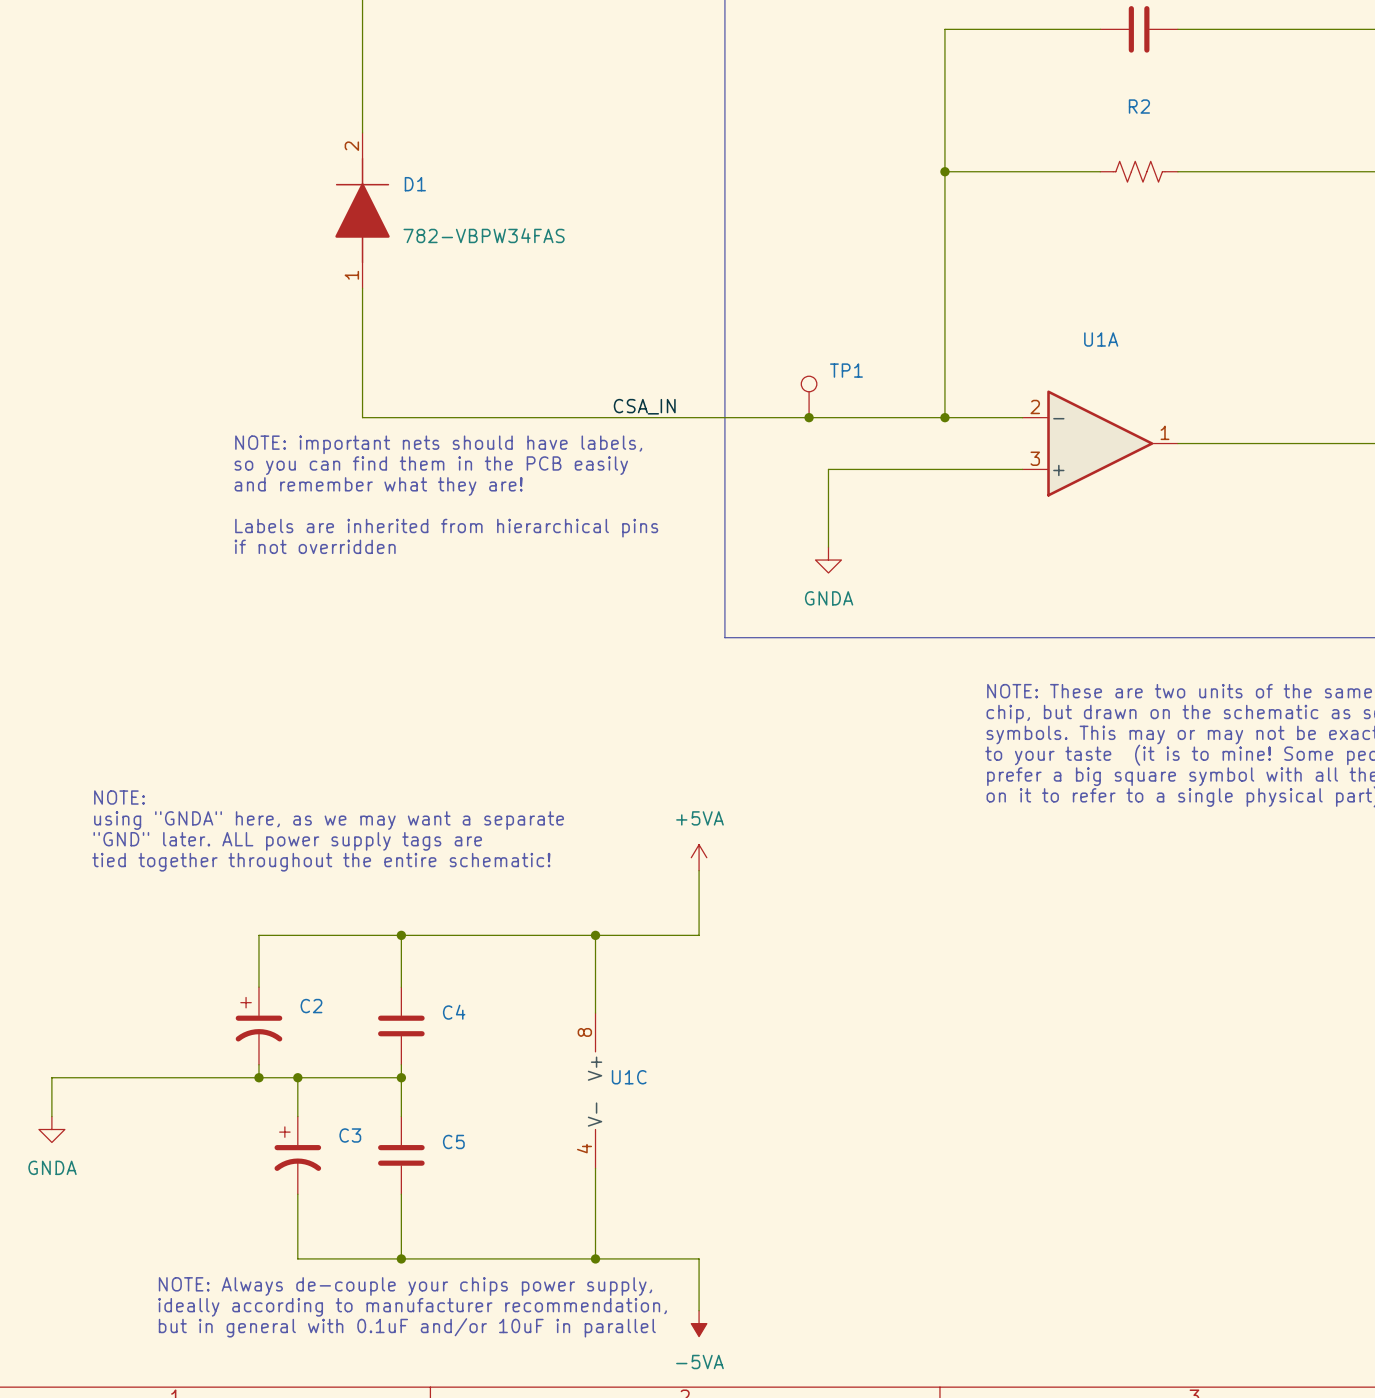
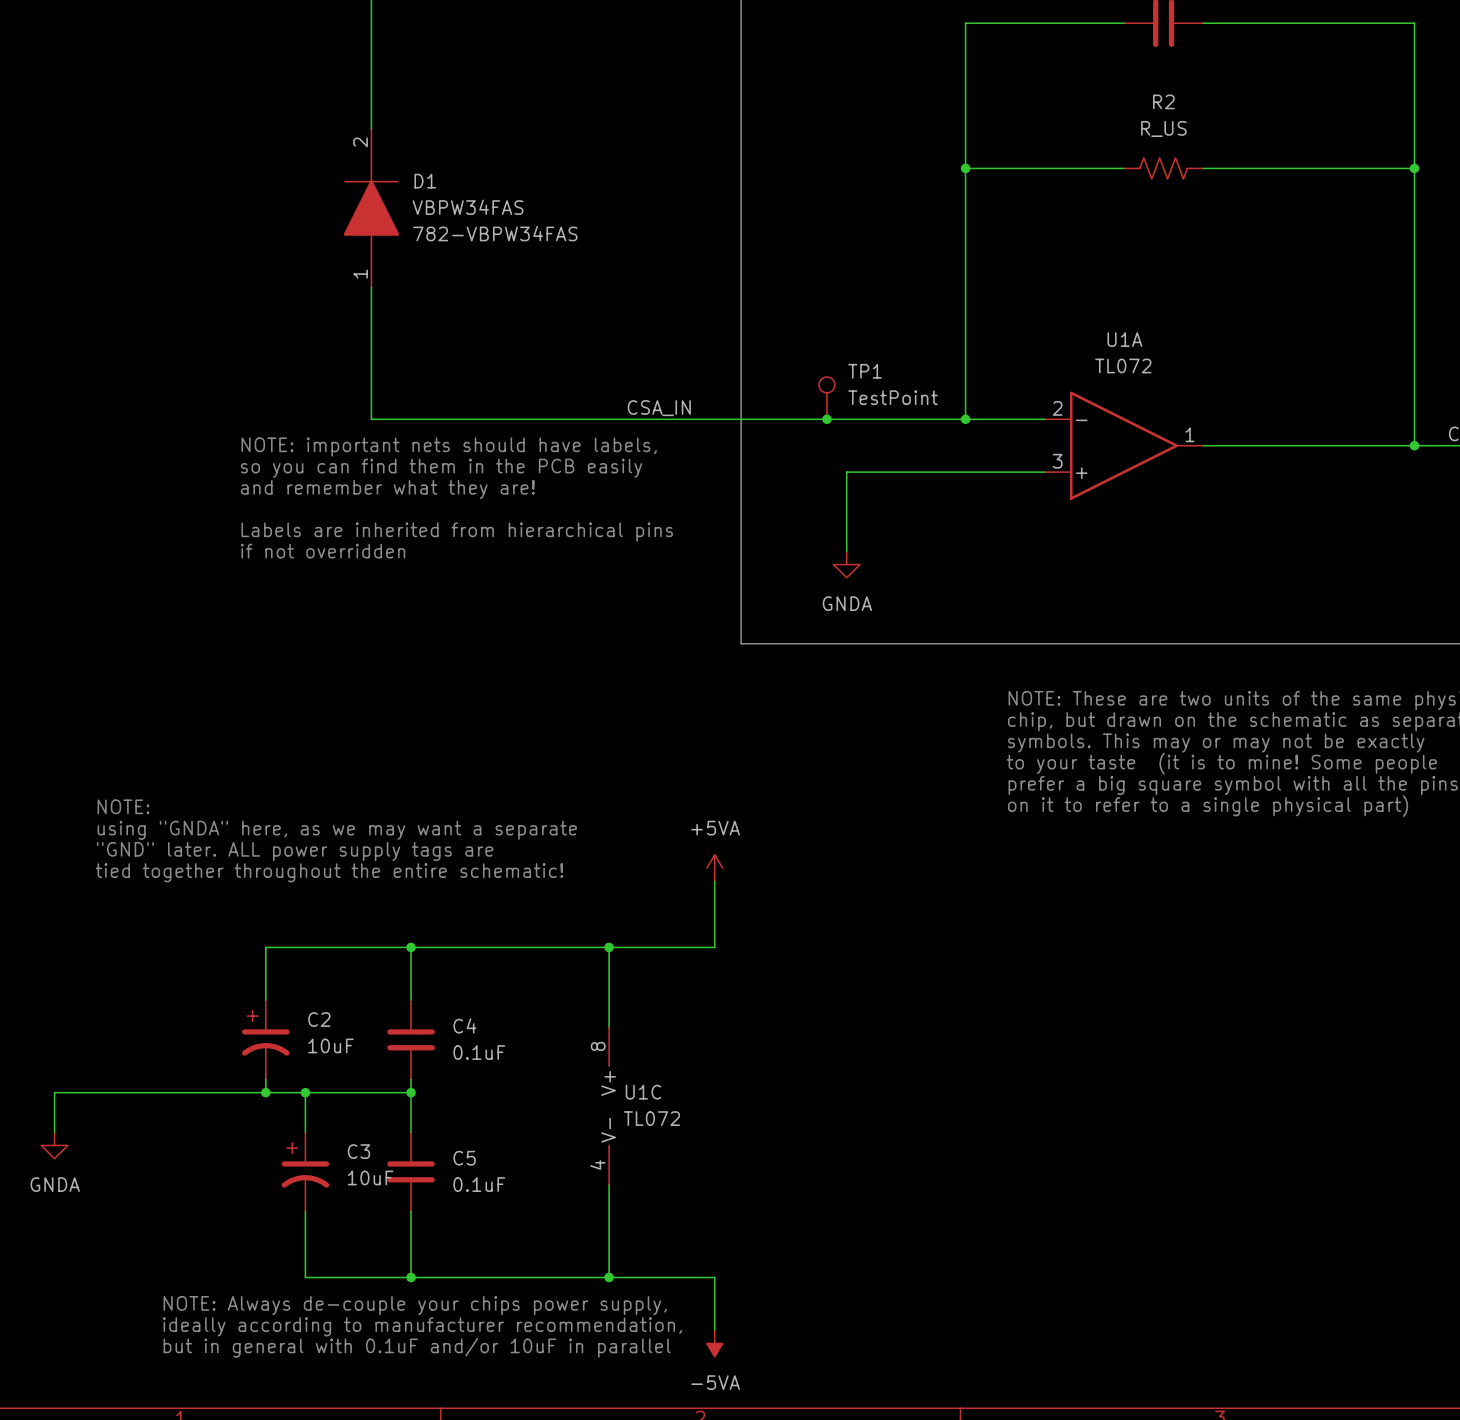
R2 value: none -> R_US (1163, 128)
D1 value: none -> VBPW34FAS (468, 207)
U1A value: none -> TL072 (1123, 365)
TP1 value: none -> TestPoint (893, 397)
C2 value: none -> 10uF (330, 1045)
C4 value: none -> 0.1uF (479, 1052)
U1C value: none -> TL072 (651, 1118)
C3 value: none -> 10uF (370, 1177)
C5 value: none -> 0.1uF (479, 1184)

